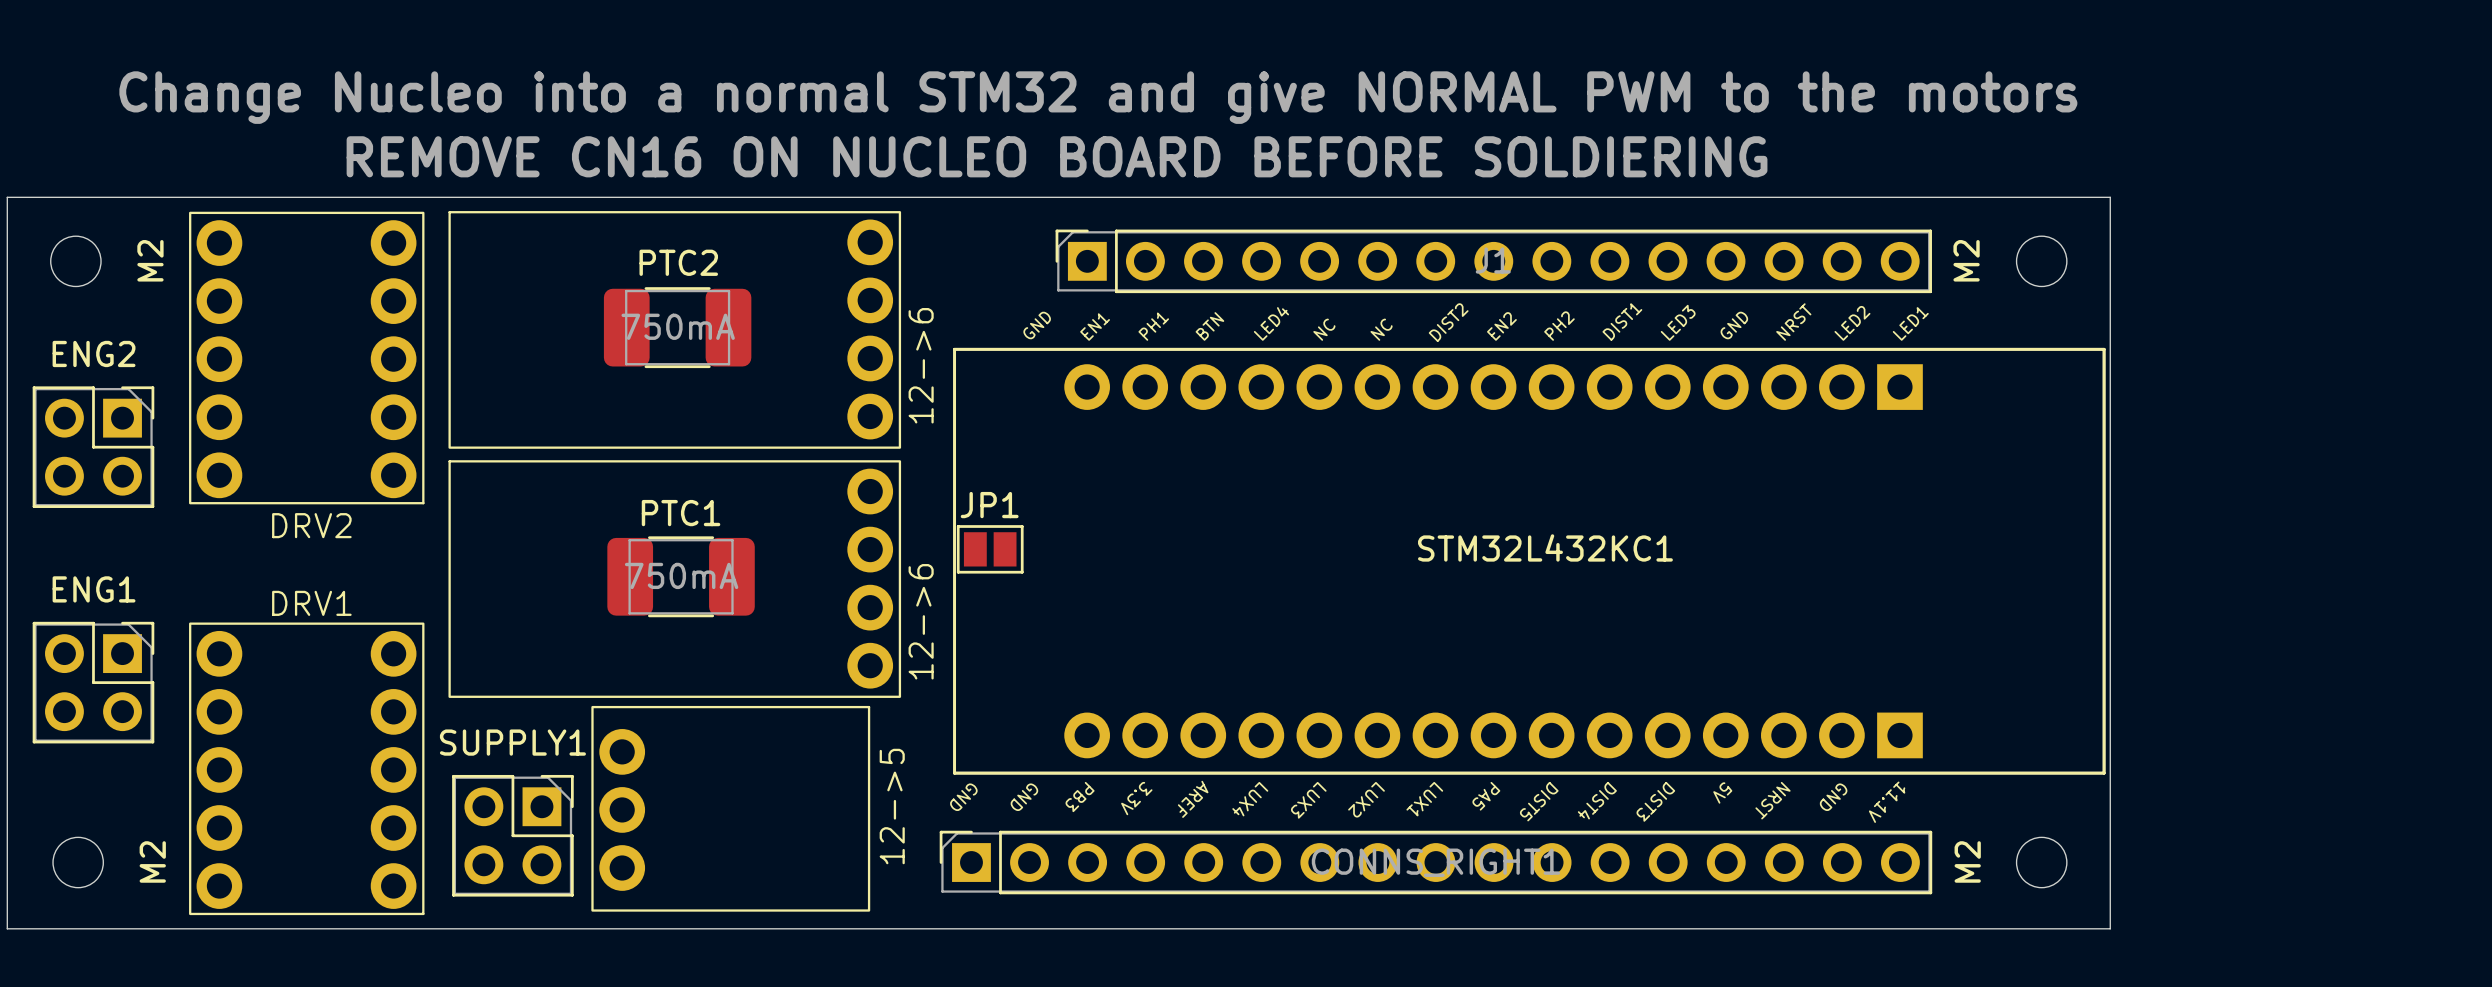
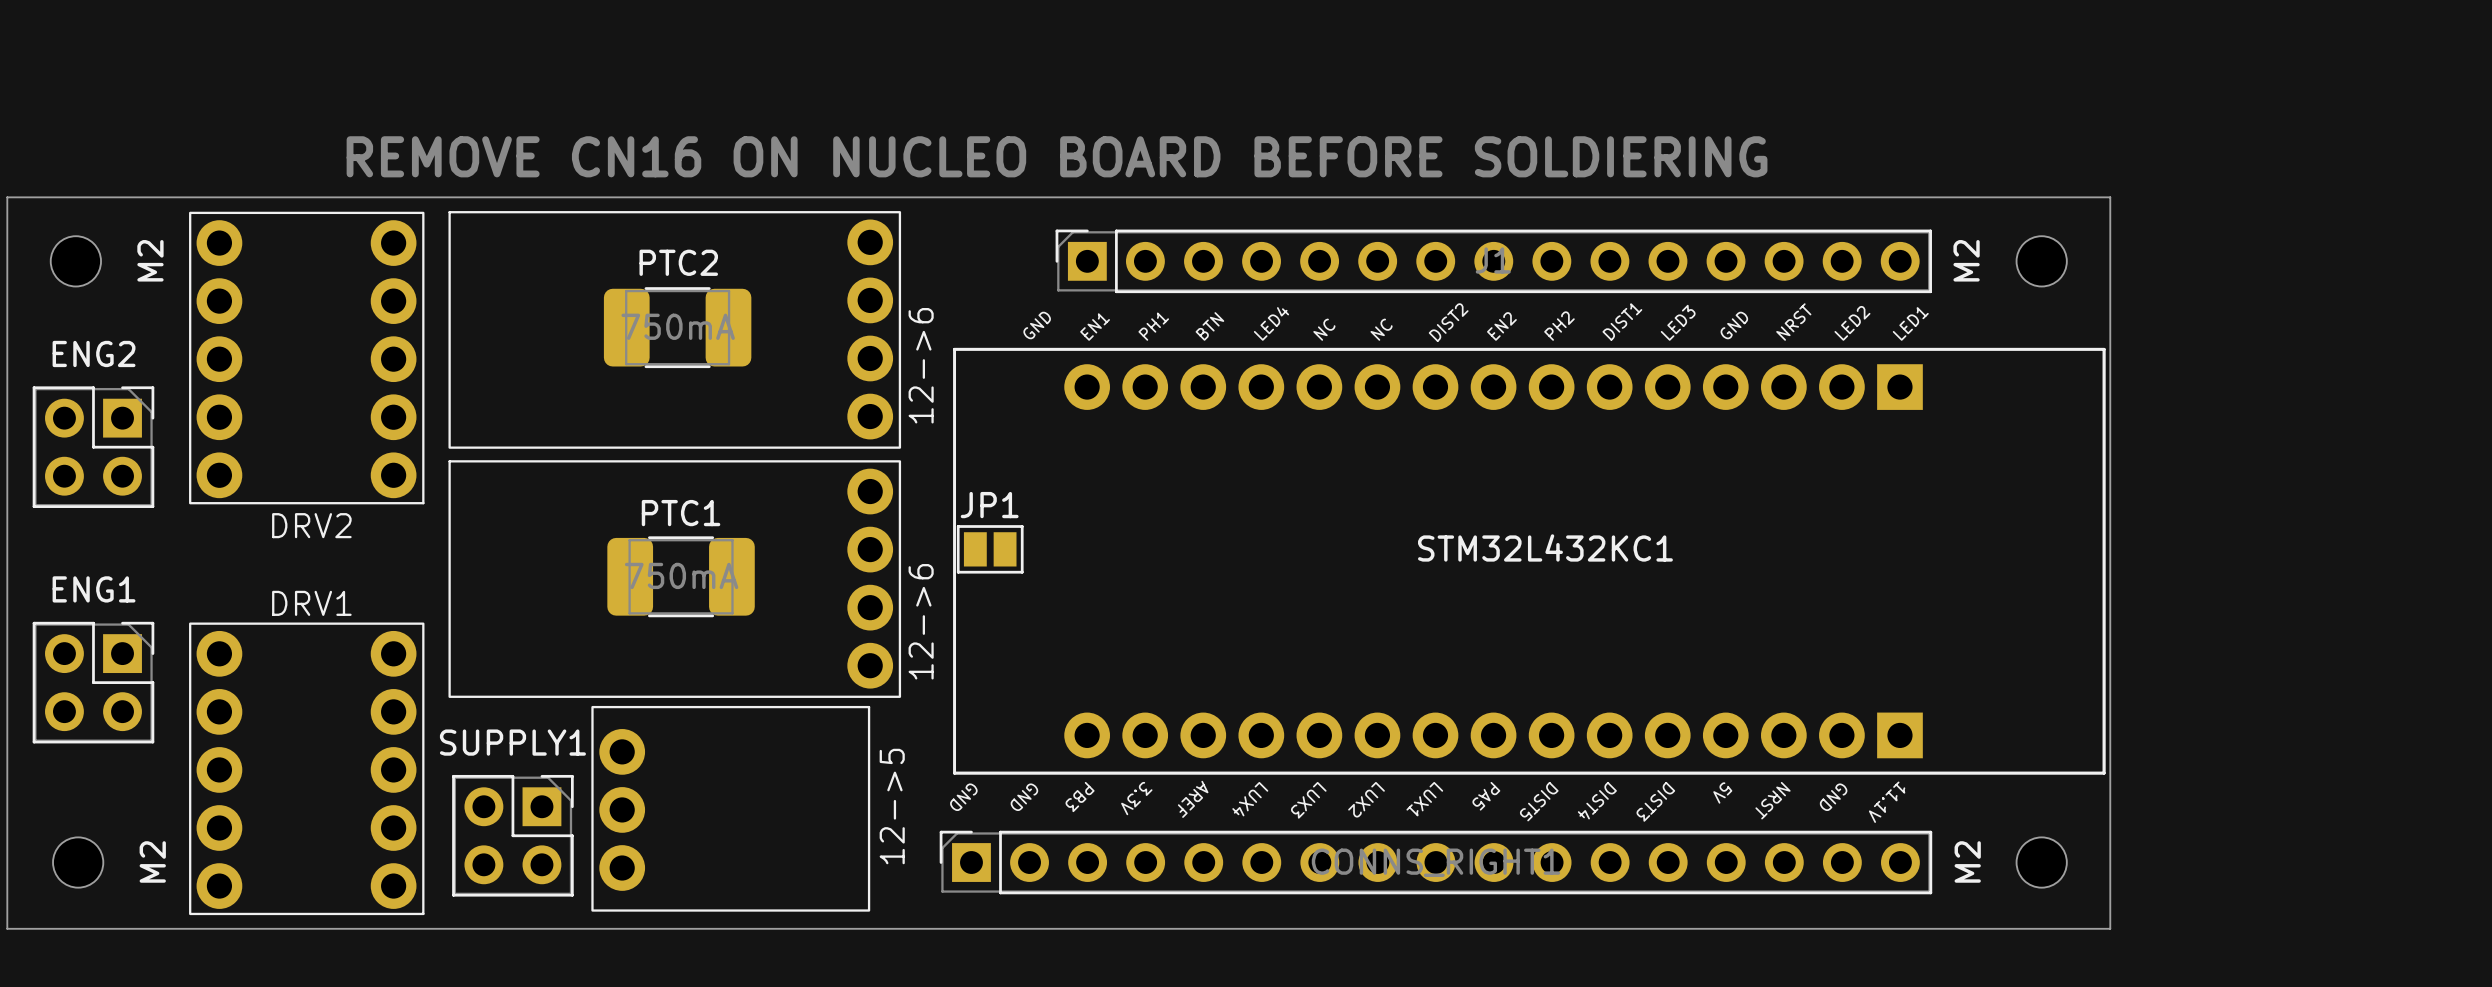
text: Change Nucleo into a normal STM32 and give NORMAL PWM to the motors (1098, 97) -> none

